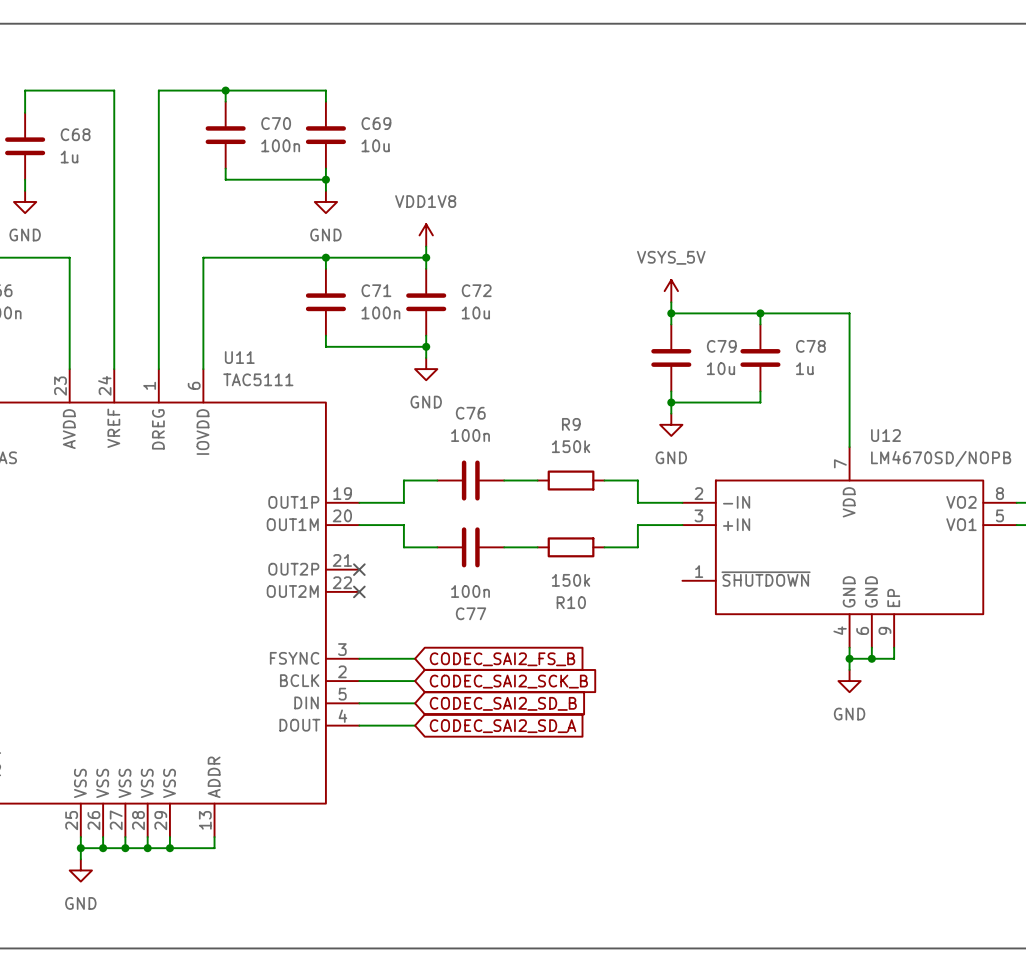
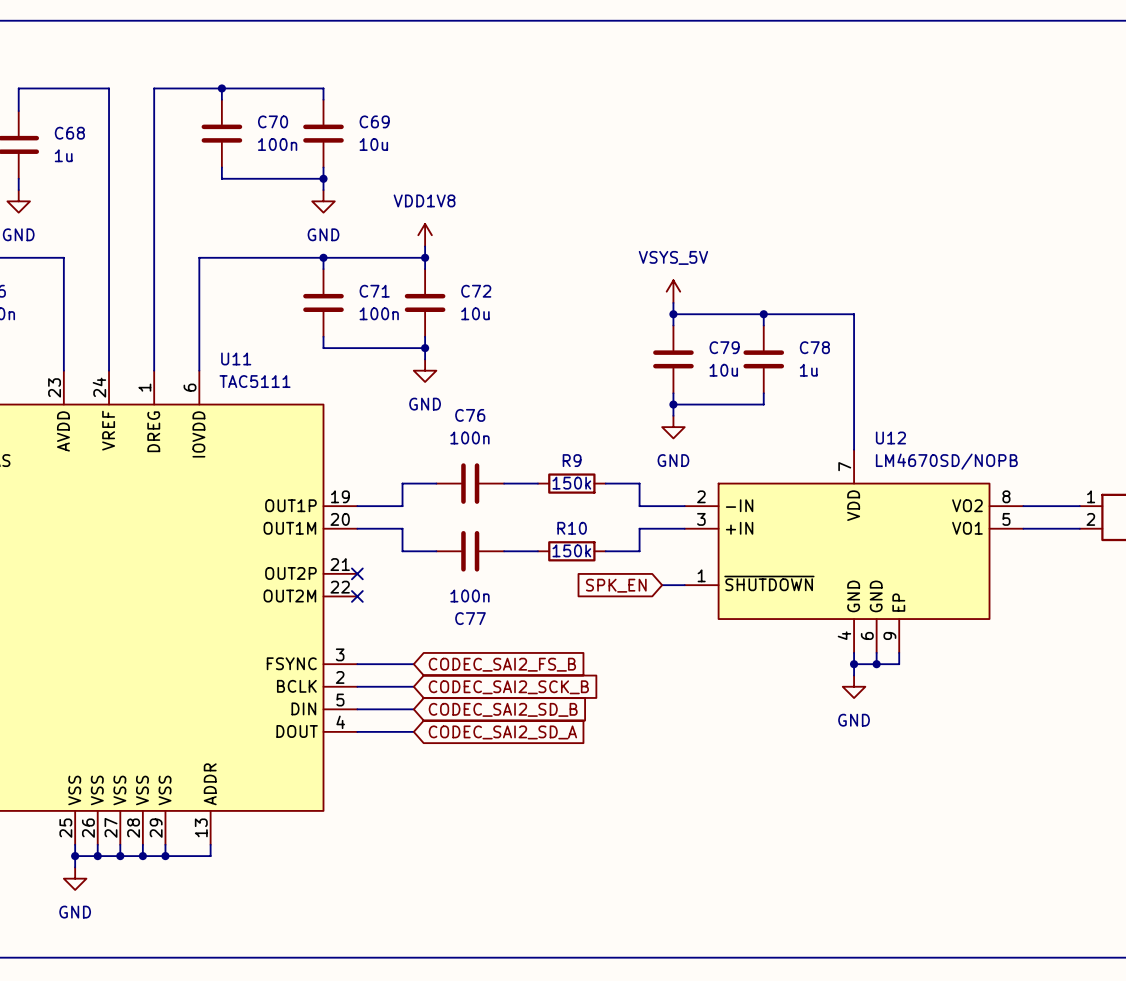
R9 name position: R9 (571, 424) -> R9 (572, 460)
R9 value position: 150k (571, 446) -> 150k (571, 483)
R10 value position: 150k (571, 580) -> 150k (571, 550)
wire: none -> (662, 585) (684, 585)
global label: none -> SPK_EN (616, 585)
R10 name position: R10 (571, 602) -> R10 (572, 528)

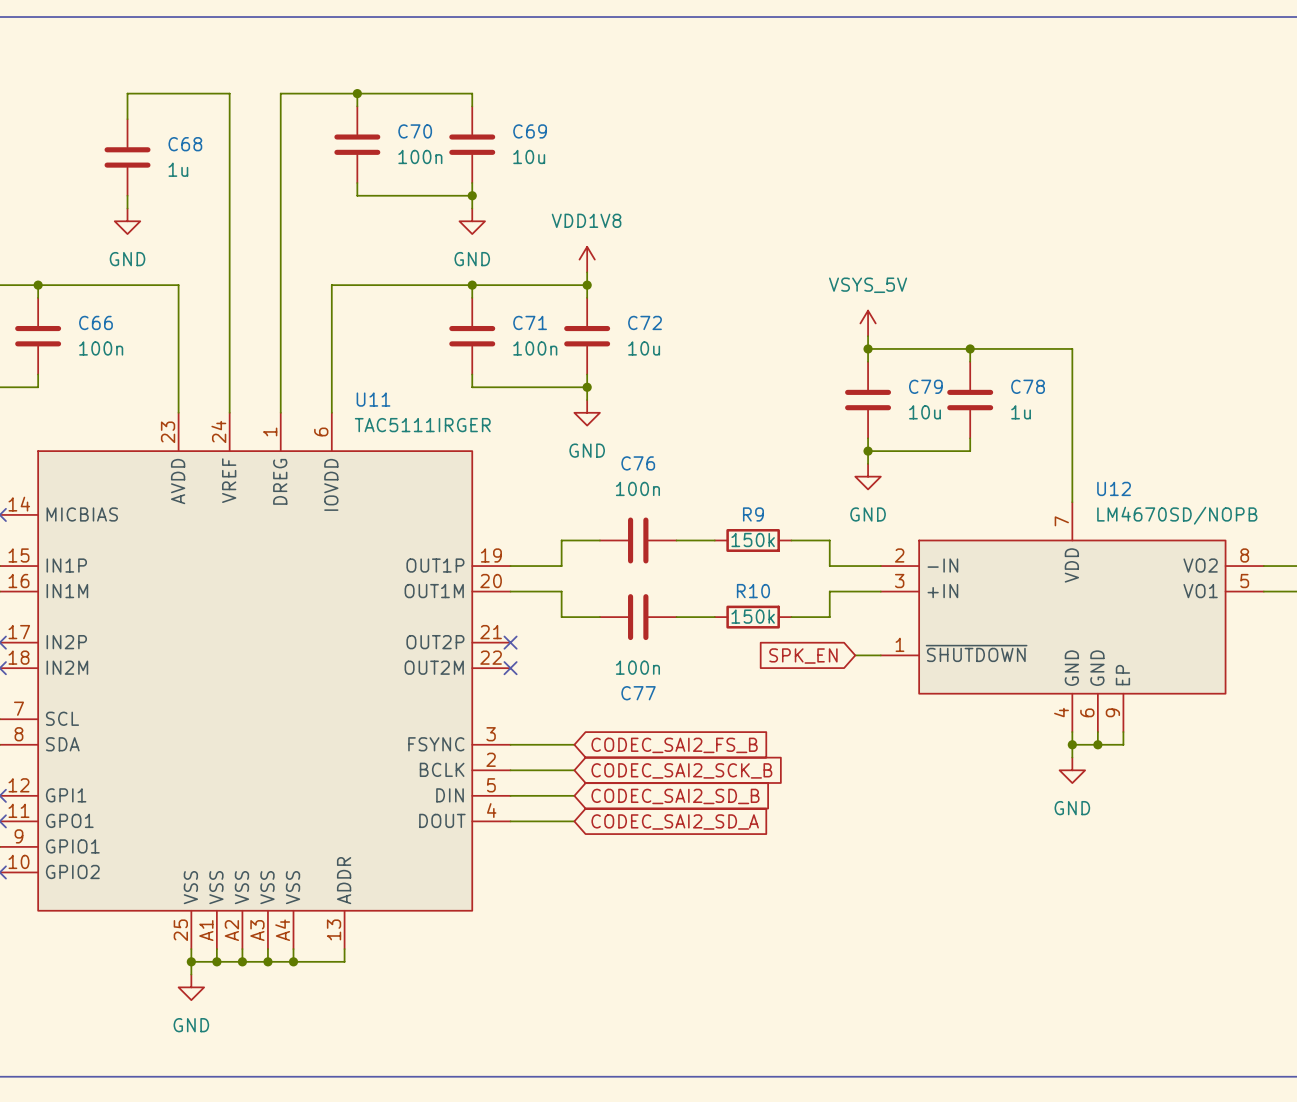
U11 value: TAC5111 (255, 381) -> TAC5111IRGER (422, 425)
U11 pin number: 27 (110, 827) -> A2 (231, 930)
U11 pin number: 26 (88, 828) -> A1 (206, 930)
U11 pin number: 28 (133, 828) -> A3 (257, 930)
U11 pin number: 29 (156, 828) -> A4 (282, 930)

